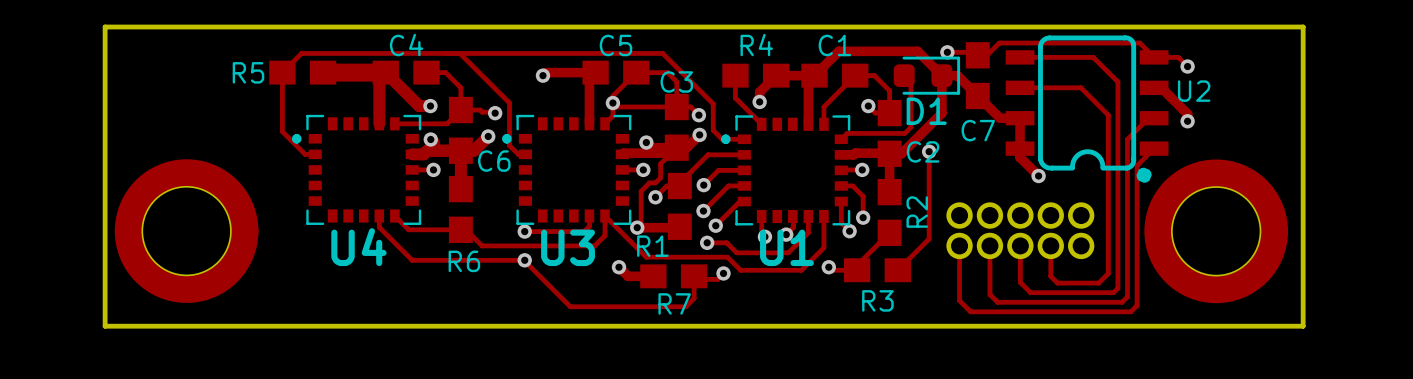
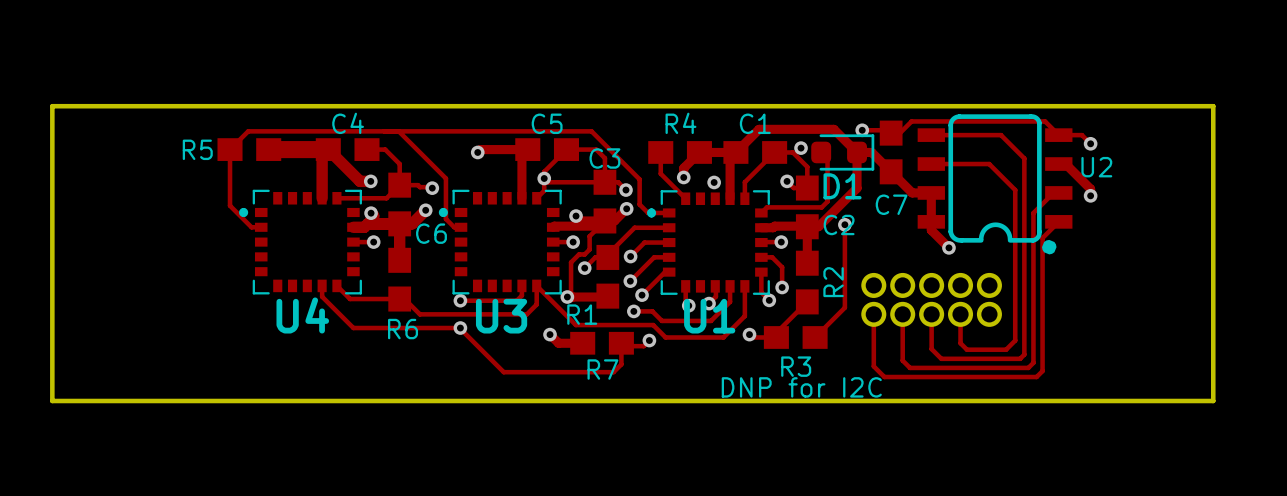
board edge: (105, 27) (105, 326) (1303, 326) (1303, 27) -> (61, 106) (52, 106) (52, 401) (1213, 401) (1213, 106) (1200, 106)
via: none -> (801, 148)
via: none -> (714, 182)
part: (186, 231) -> none
part: (1216, 231) -> none
text: none -> DNP for I2C (801, 387)

